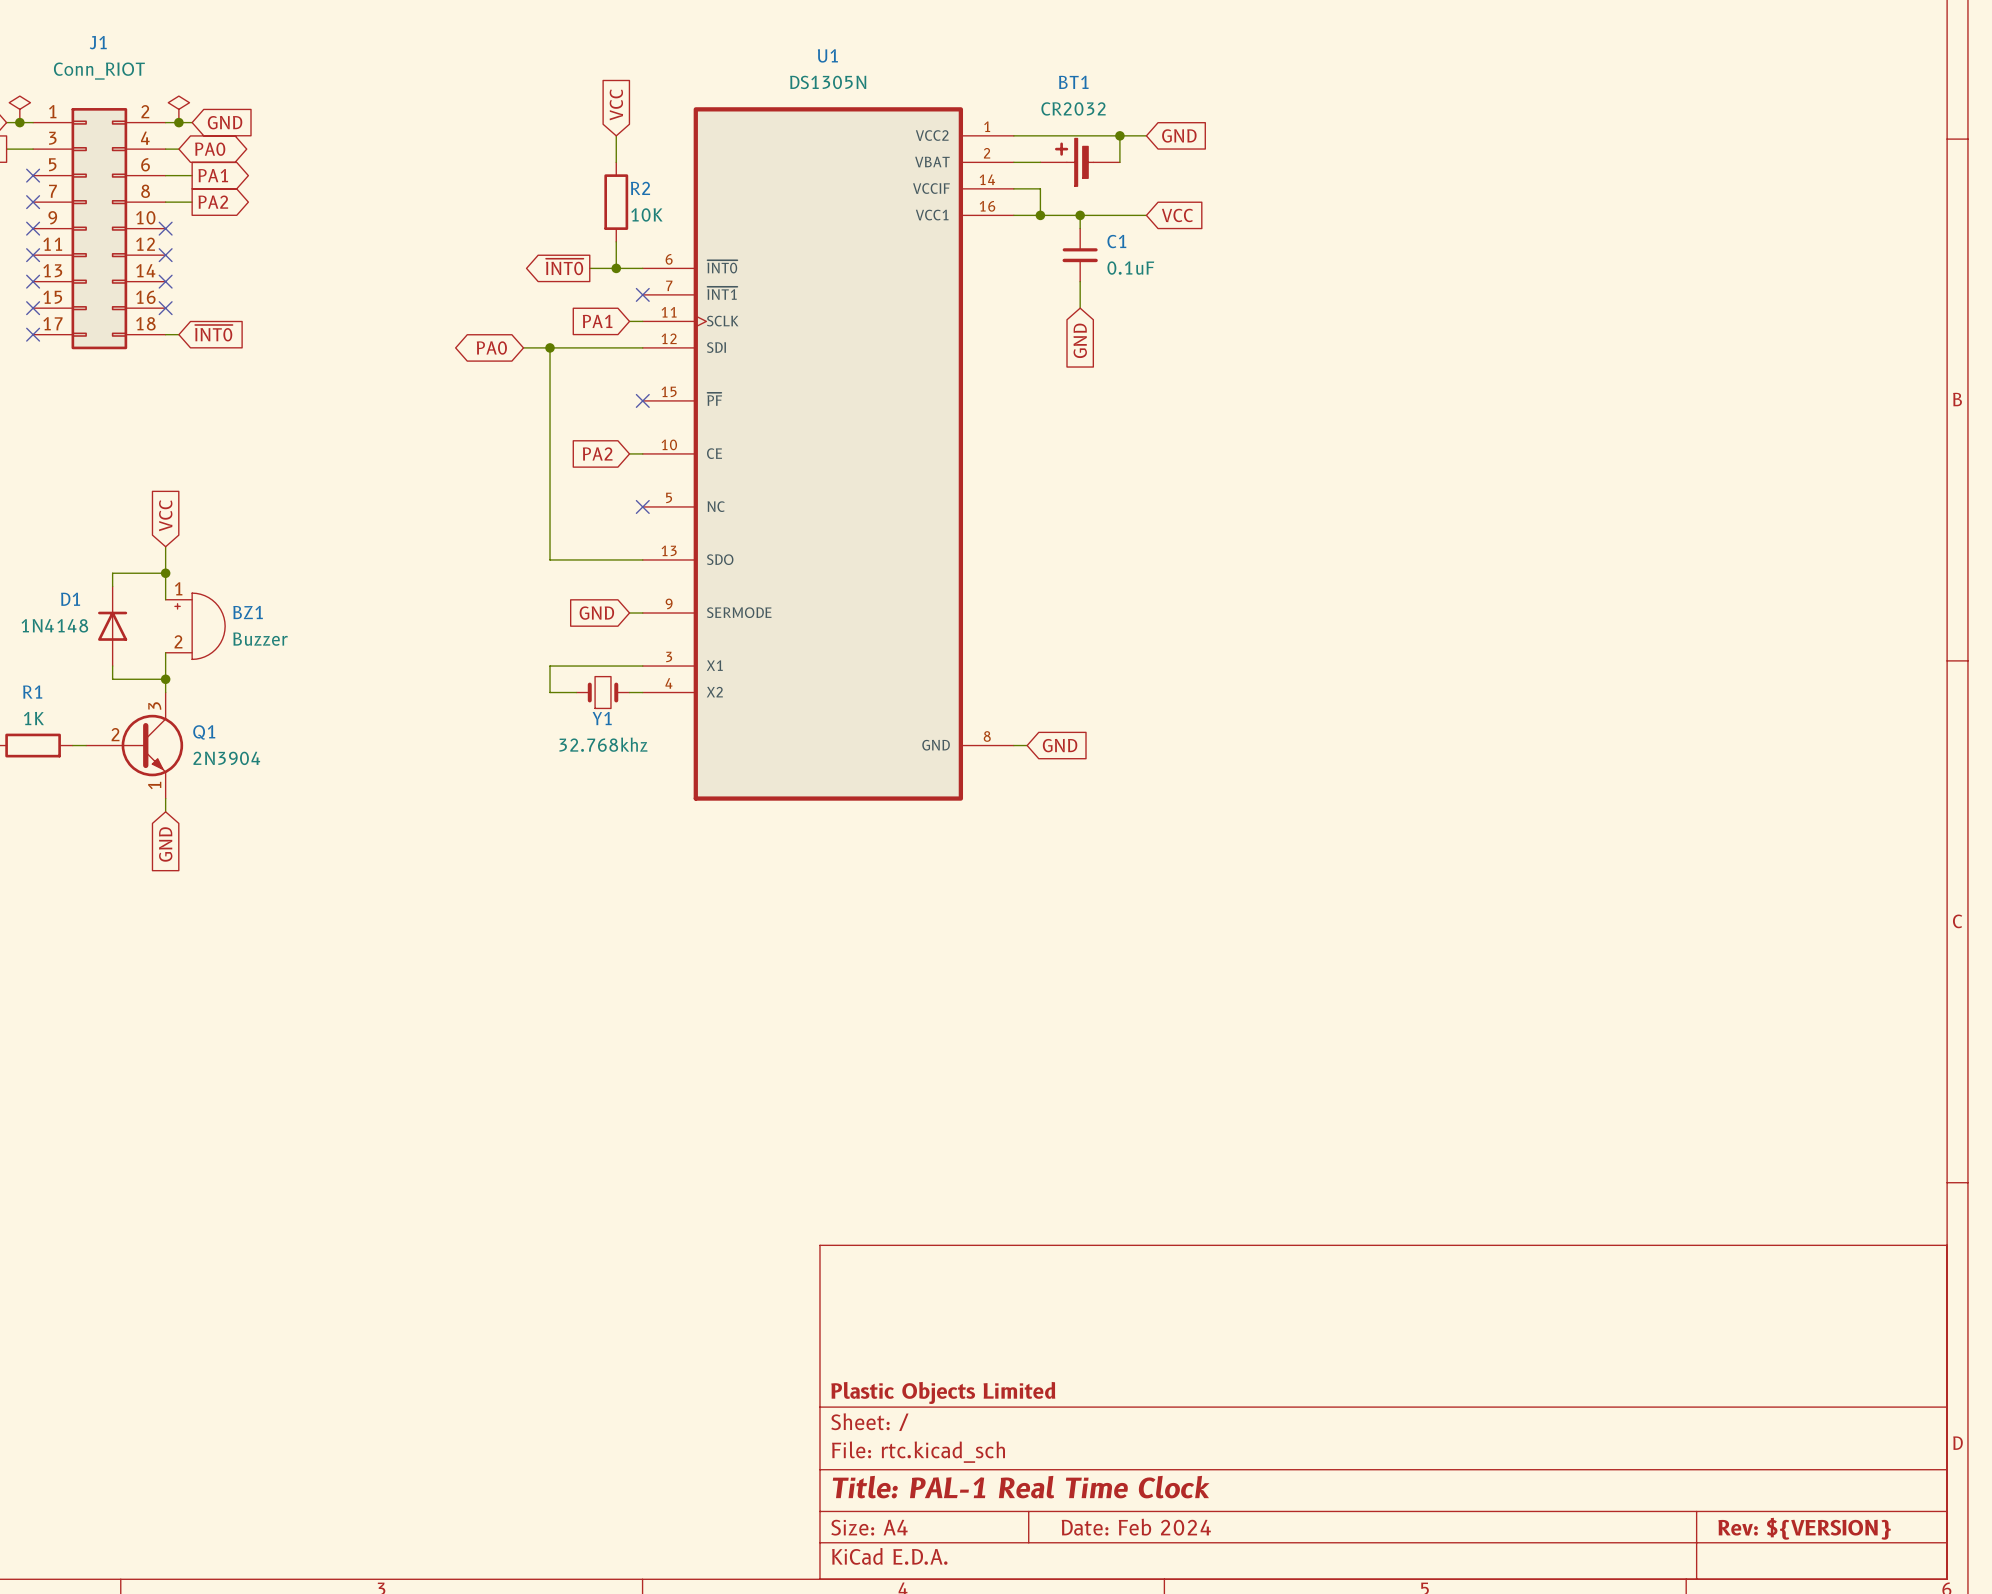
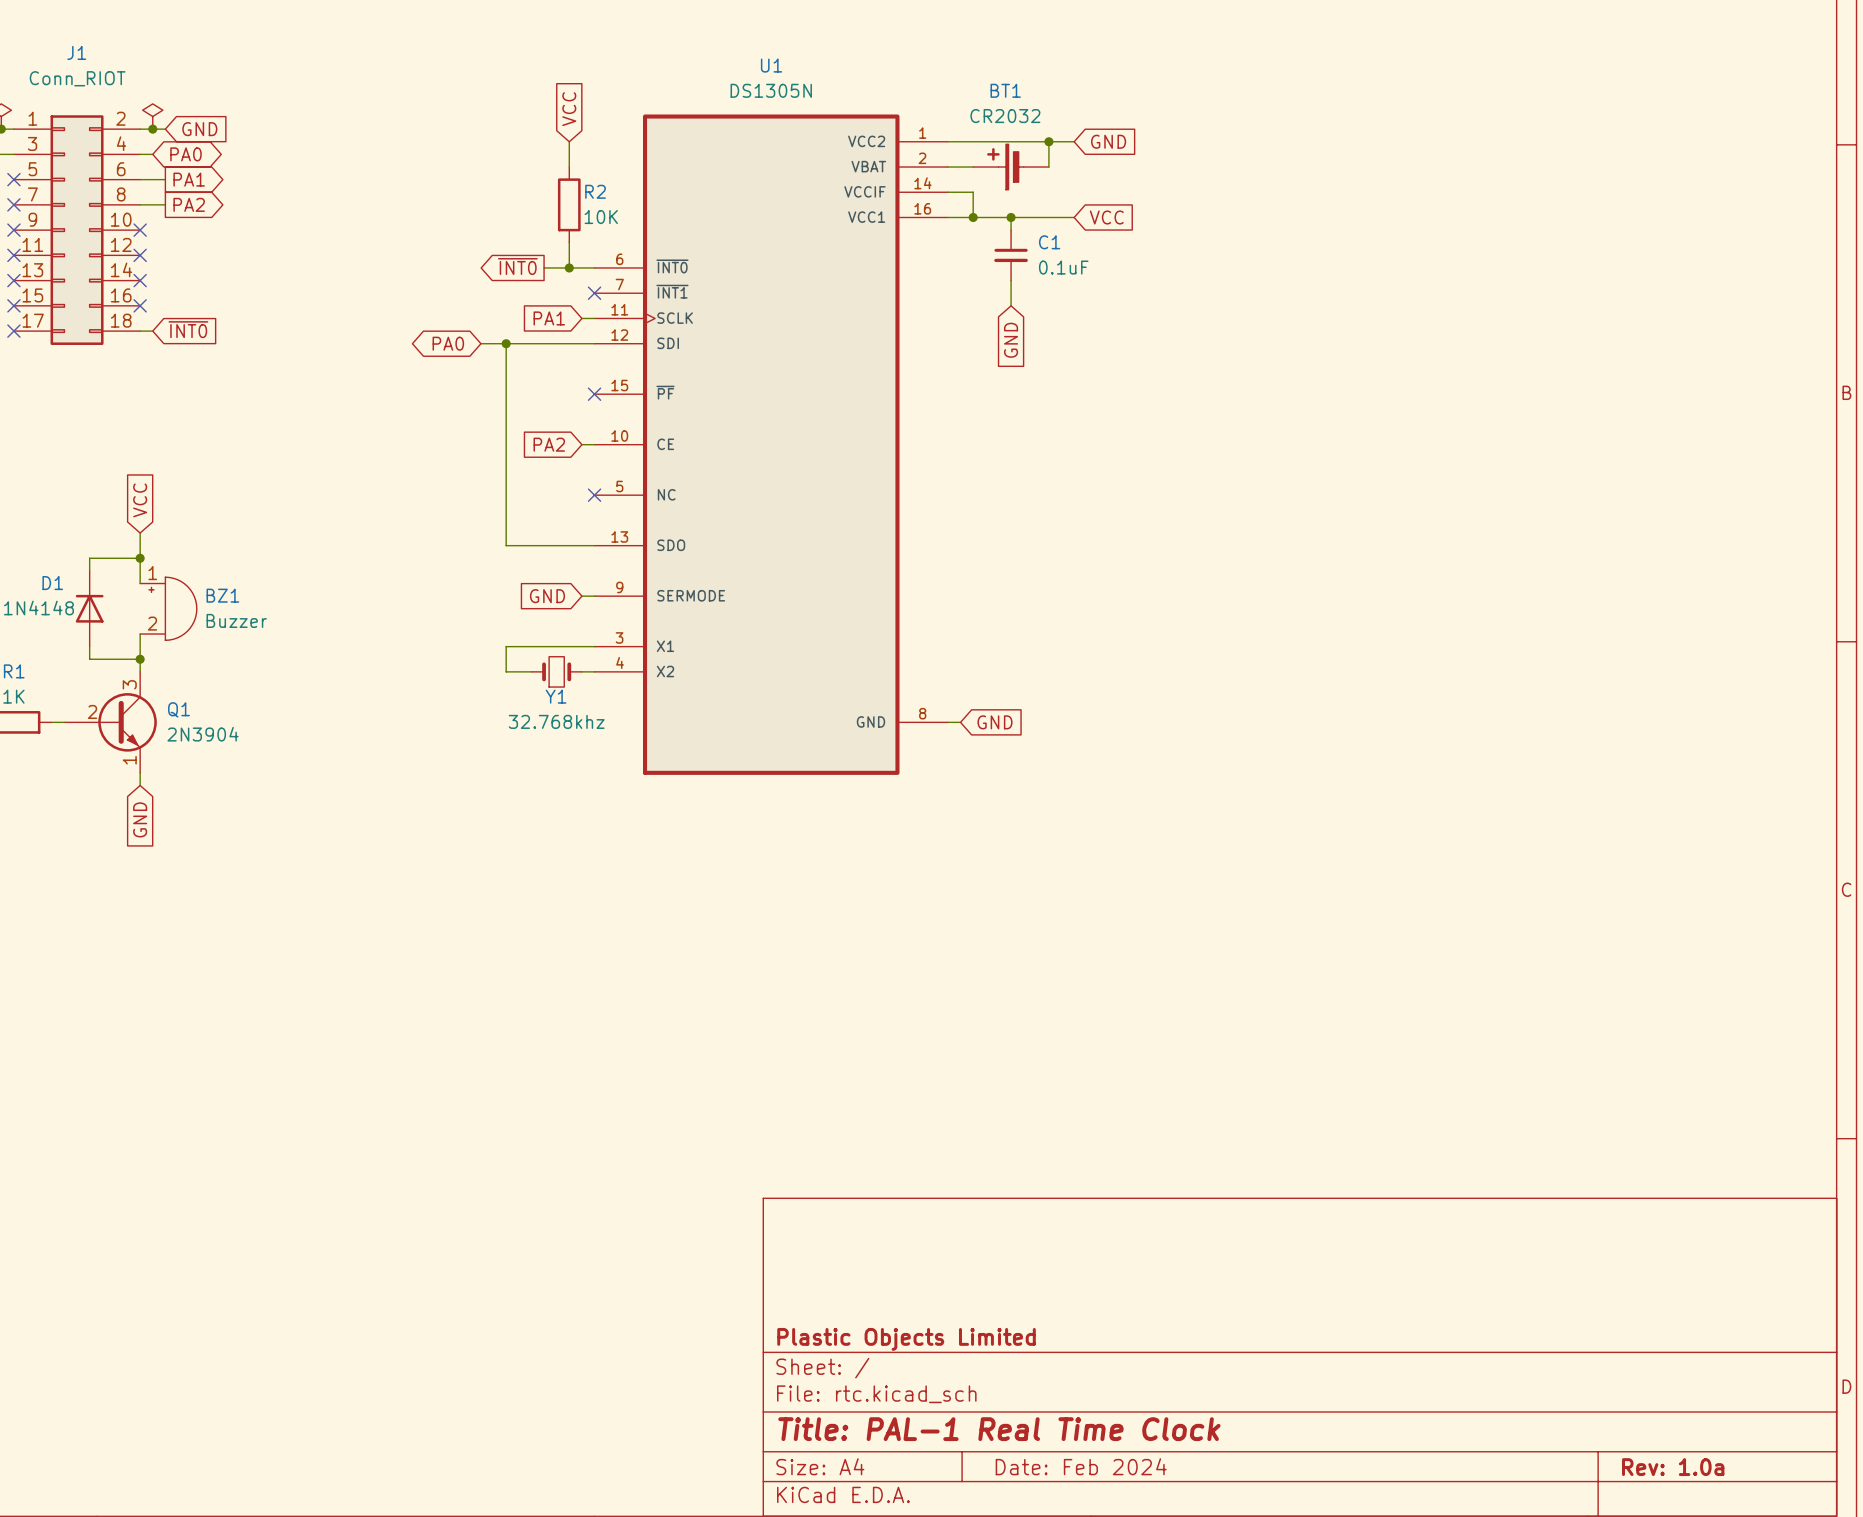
title block: Rev: ${VERSION} (1804, 1528) -> Rev: 1.0a (1673, 1467)

